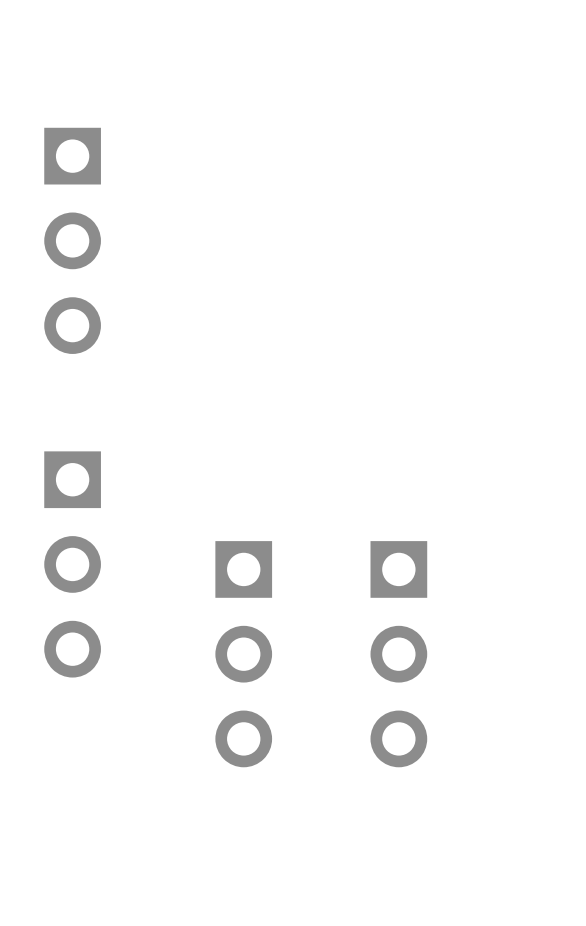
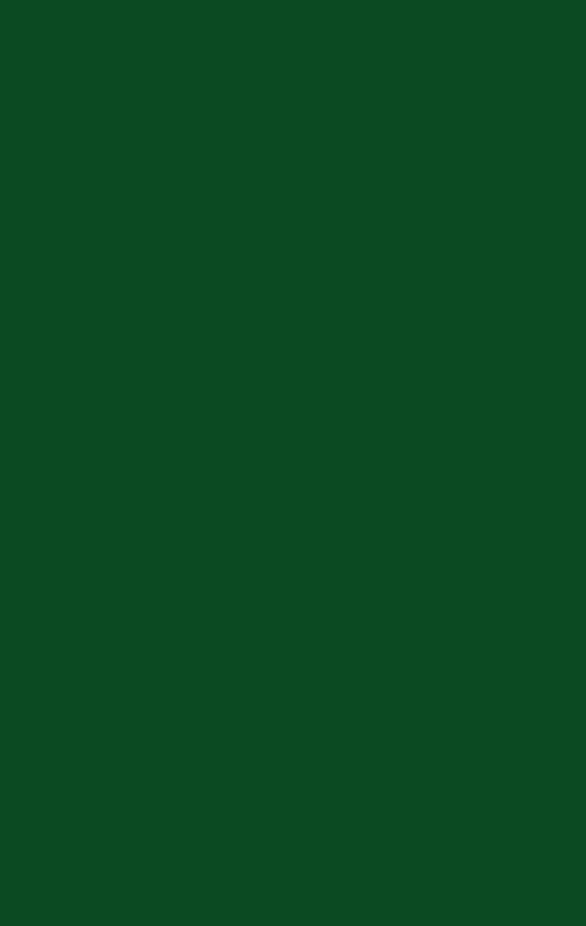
part: (72, 240) -> none
part: (72, 564) -> none
part: (243, 654) -> none
part: (398, 654) -> none

